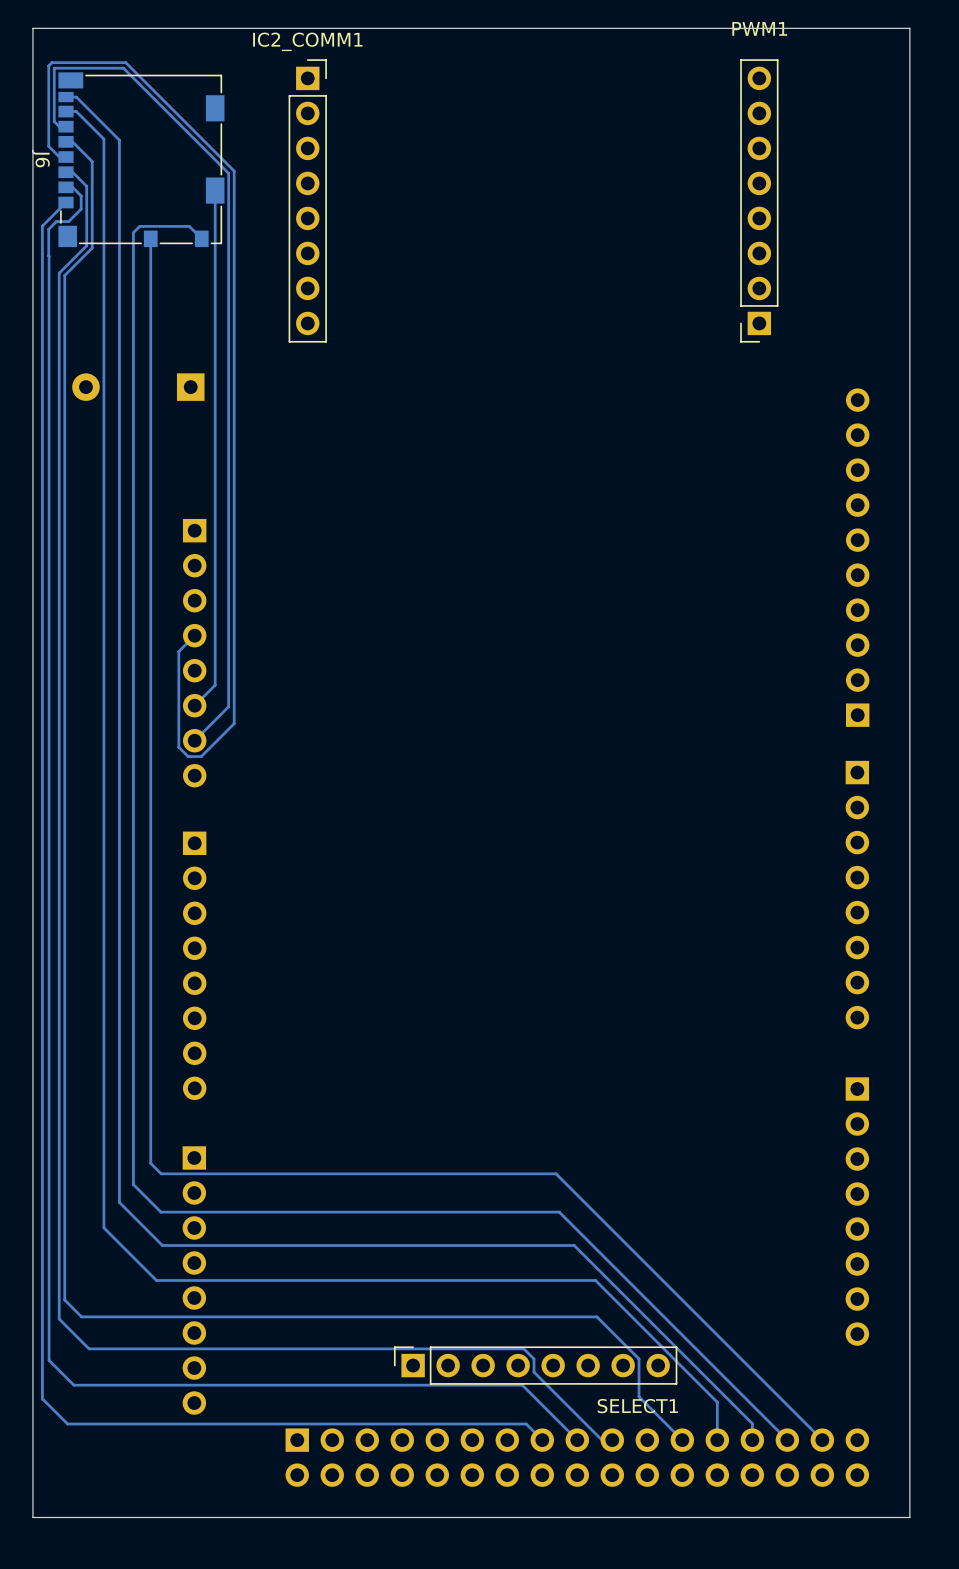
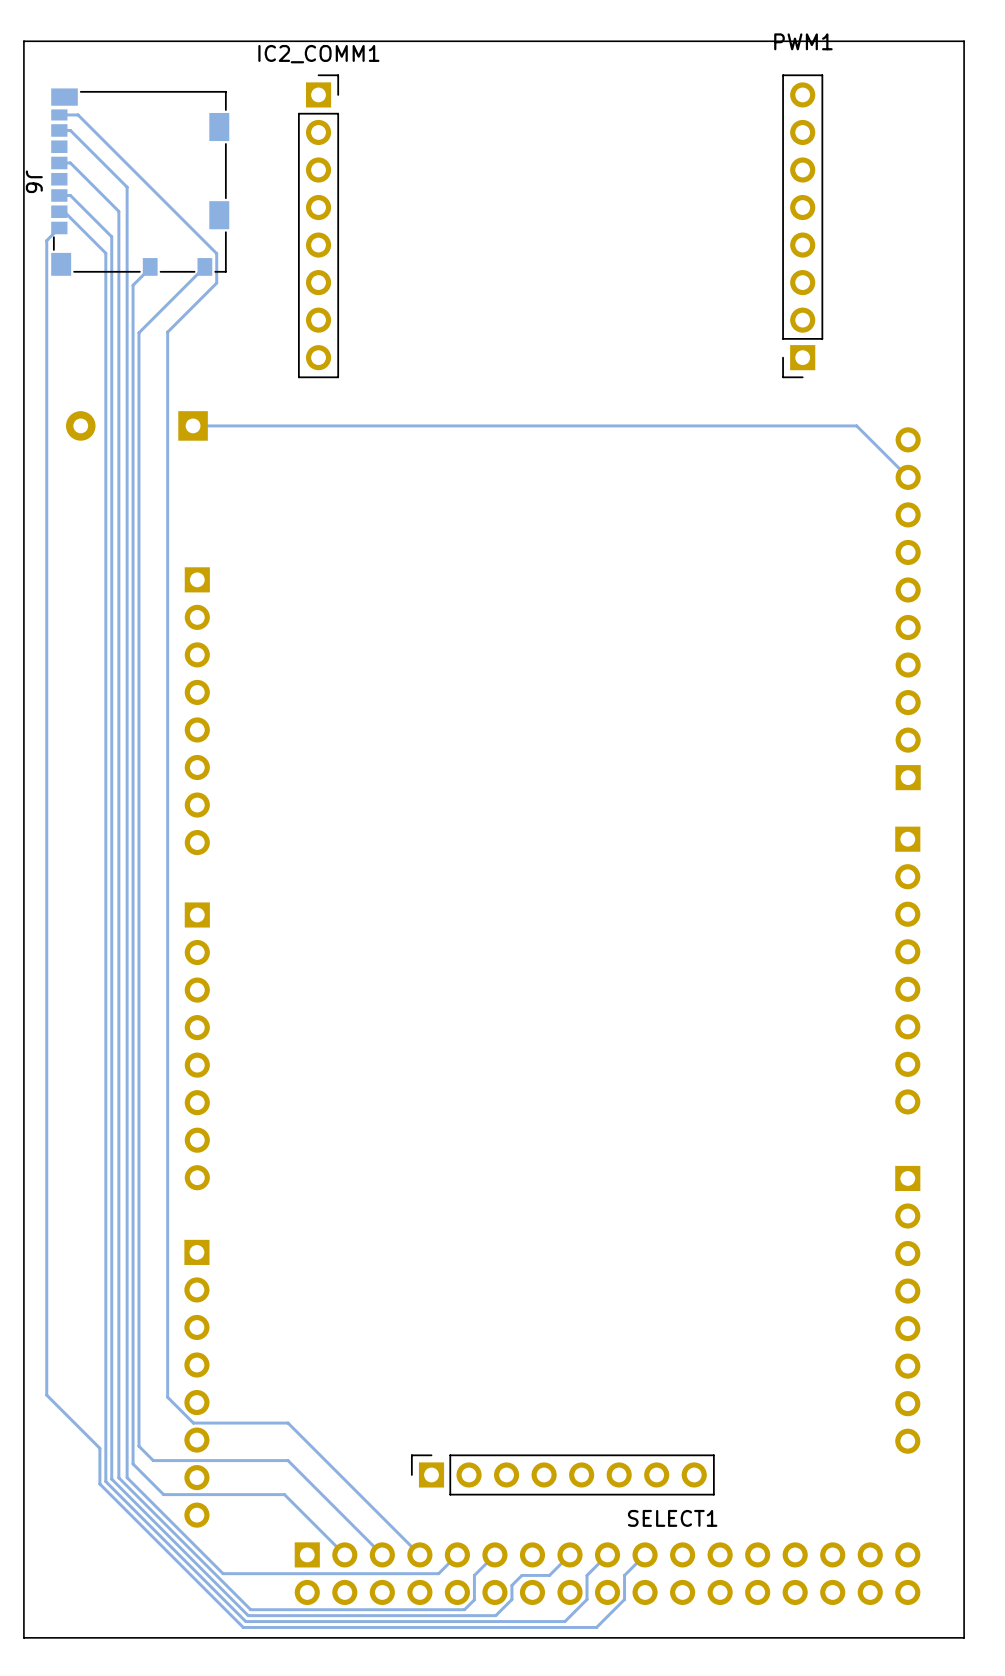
track: (76, 97) (119, 140) (119, 1202) (162, 1245) (574, 1245) (752, 1423) (752, 1440) -> (70, 114) (78, 114) (216, 253) (216, 283) (167, 332) (167, 1397) (193, 1423) (288, 1423) (419, 1554)
track: (66, 126) (59, 126) (54, 121) (54, 68) (123, 68) (228, 173) (228, 706) (194, 740) -> none
track: (103, 139) (103, 1227) (156, 1280) (595, 1280) (717, 1402) (717, 1440) -> (99, 160) (127, 187) (127, 1477) (223, 1573) (438, 1573) (457, 1554)
track: (72, 141) (92, 161) (92, 248) (64, 275) (64, 1300) (81, 1316) (596, 1316) (639, 1358) (639, 1396) (682, 1440) -> (66, 162) (70, 162) (118, 211) (118, 1477) (250, 1609) (464, 1609) (474, 1599) (474, 1575) (494, 1554)
track: (66, 157) (59, 157) (48, 146) (48, 65) (51, 62) (125, 62) (234, 171) (234, 723) (201, 756) (188, 756) (178, 747) (178, 651) (194, 635) -> none
track: (72, 172) (86, 186) (86, 245) (59, 273) (59, 1319) (89, 1348) (523, 1348) (534, 1358) (534, 1372) (602, 1440) (612, 1440) -> (46, 240) (46, 1395) (99, 1448) (99, 1484) (243, 1627) (596, 1627) (624, 1599) (624, 1575) (645, 1554)
track: (70, 187) (81, 195) (81, 209) (68, 221) (56, 221) (48, 229) (49, 1360) (73, 1385) (522, 1385) (577, 1440) -> (64, 211) (105, 253) (105, 1481) (245, 1621) (564, 1621) (587, 1599) (587, 1575) (607, 1554)
track: (215, 190) (215, 685) (194, 705) -> none
track: (54, 214) (42, 226) (42, 1399) (67, 1424) (526, 1424) (542, 1440) -> (66, 195) (70, 195) (111, 236) (111, 1479) (248, 1615) (495, 1615) (511, 1599) (511, 1585) (521, 1575) (549, 1575) (570, 1554)
track: (201, 238) (189, 226) (139, 226) (133, 232) (133, 1184) (160, 1212) (559, 1212) (787, 1440) -> (204, 266) (138, 332) (138, 1446) (153, 1460) (288, 1460) (382, 1554)
track: (150, 239) (150, 1163) (161, 1173) (556, 1173) (822, 1440) -> (150, 268) (133, 285) (133, 1464) (163, 1494) (284, 1494) (344, 1554)
track: none -> (193, 425) (856, 425) (908, 477)

